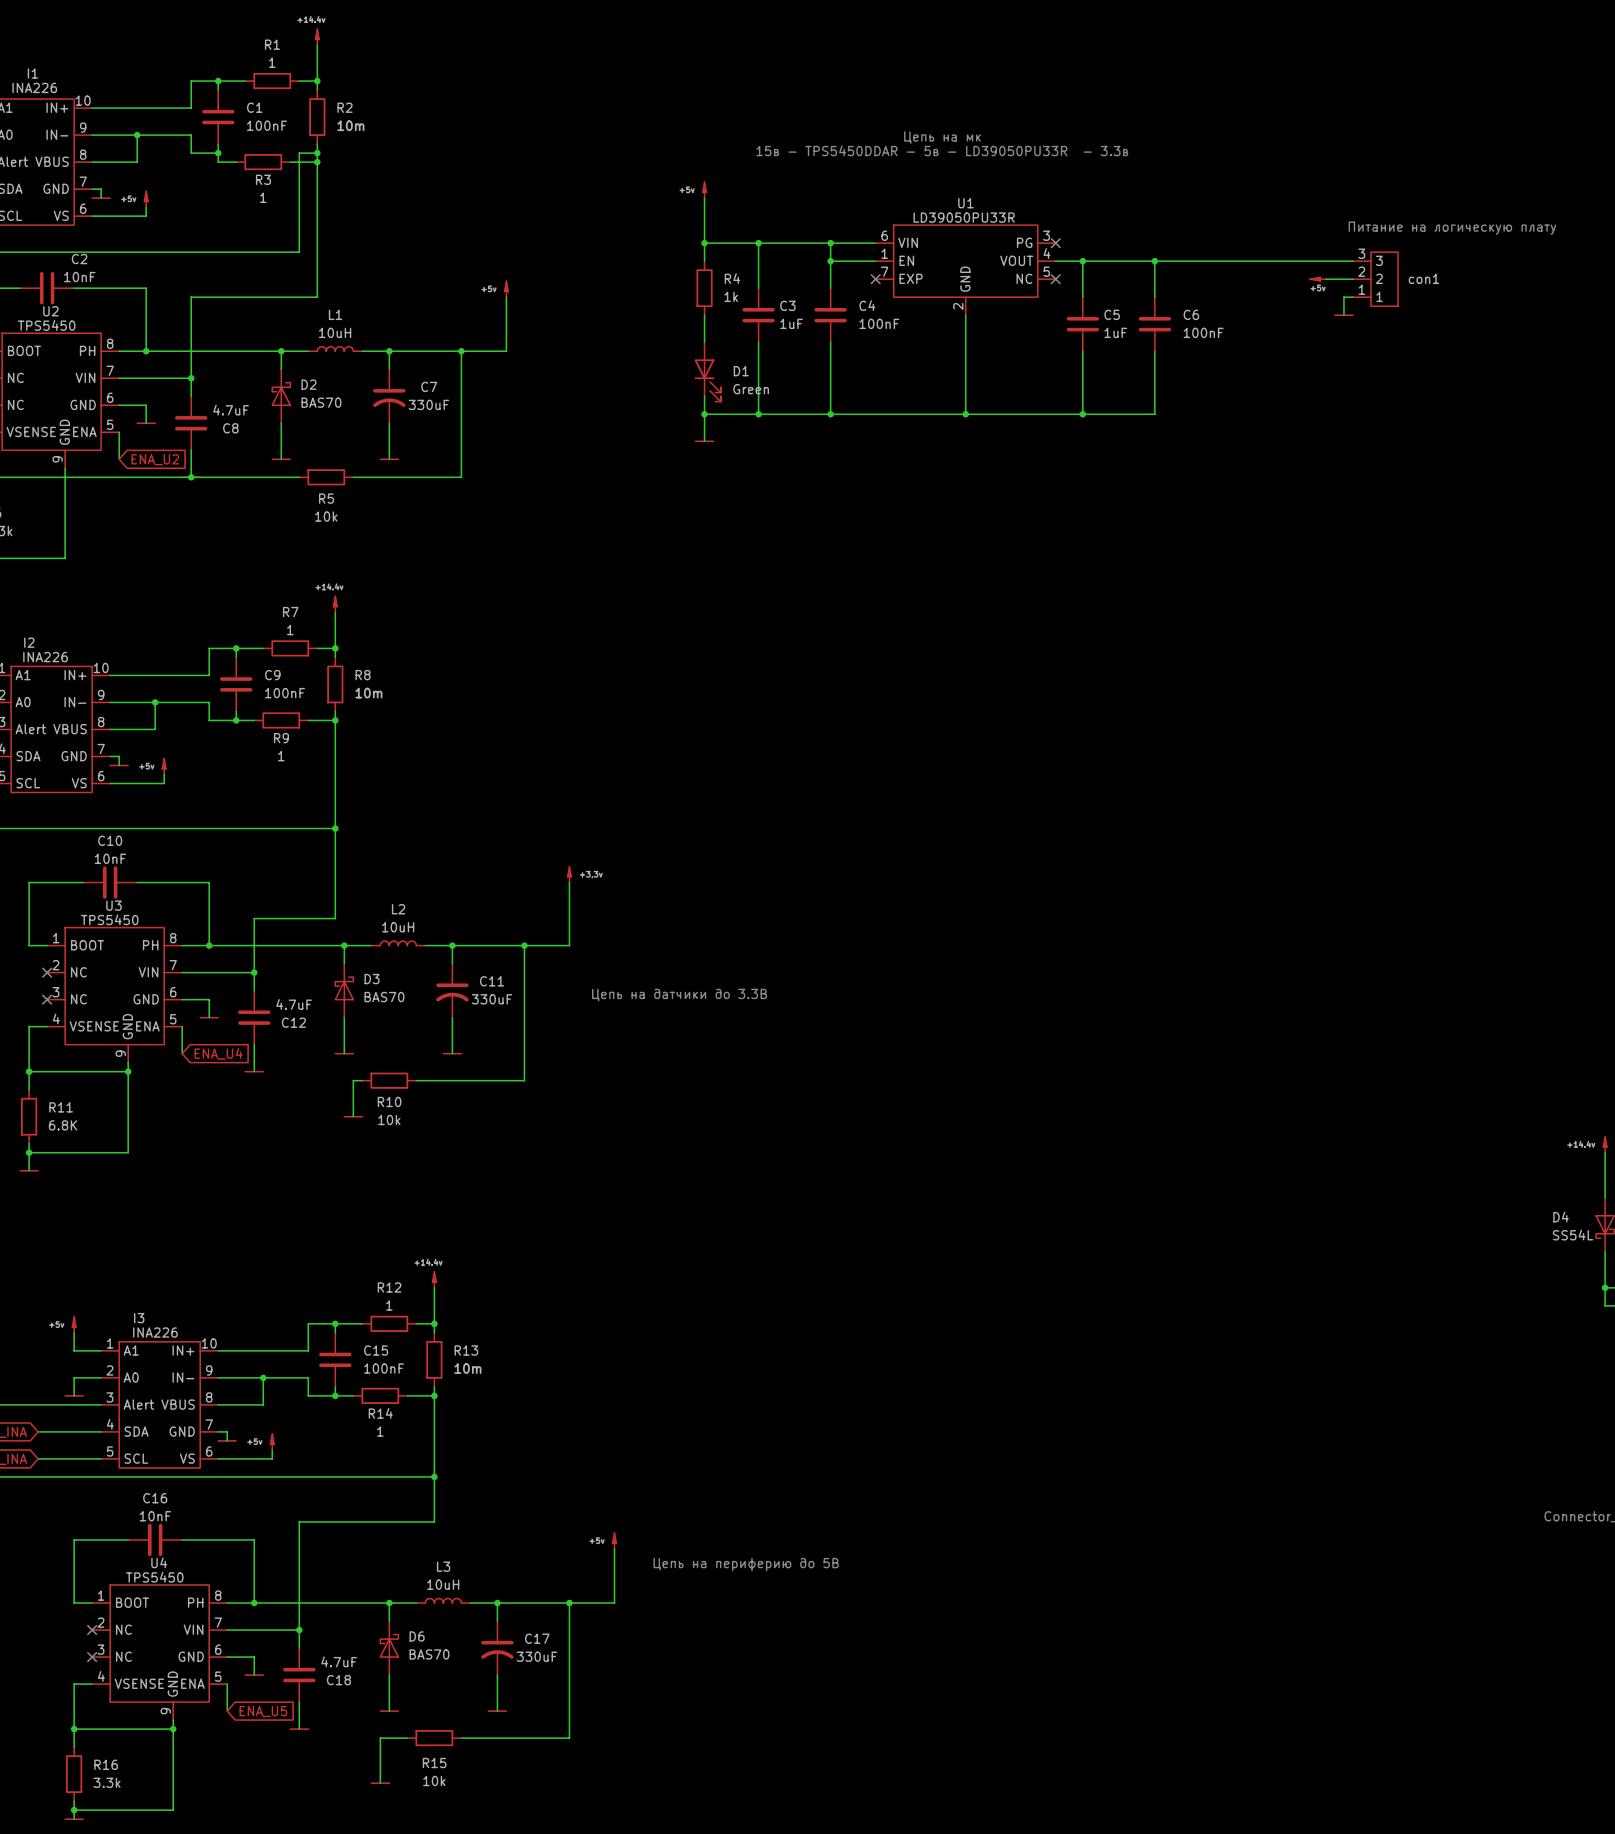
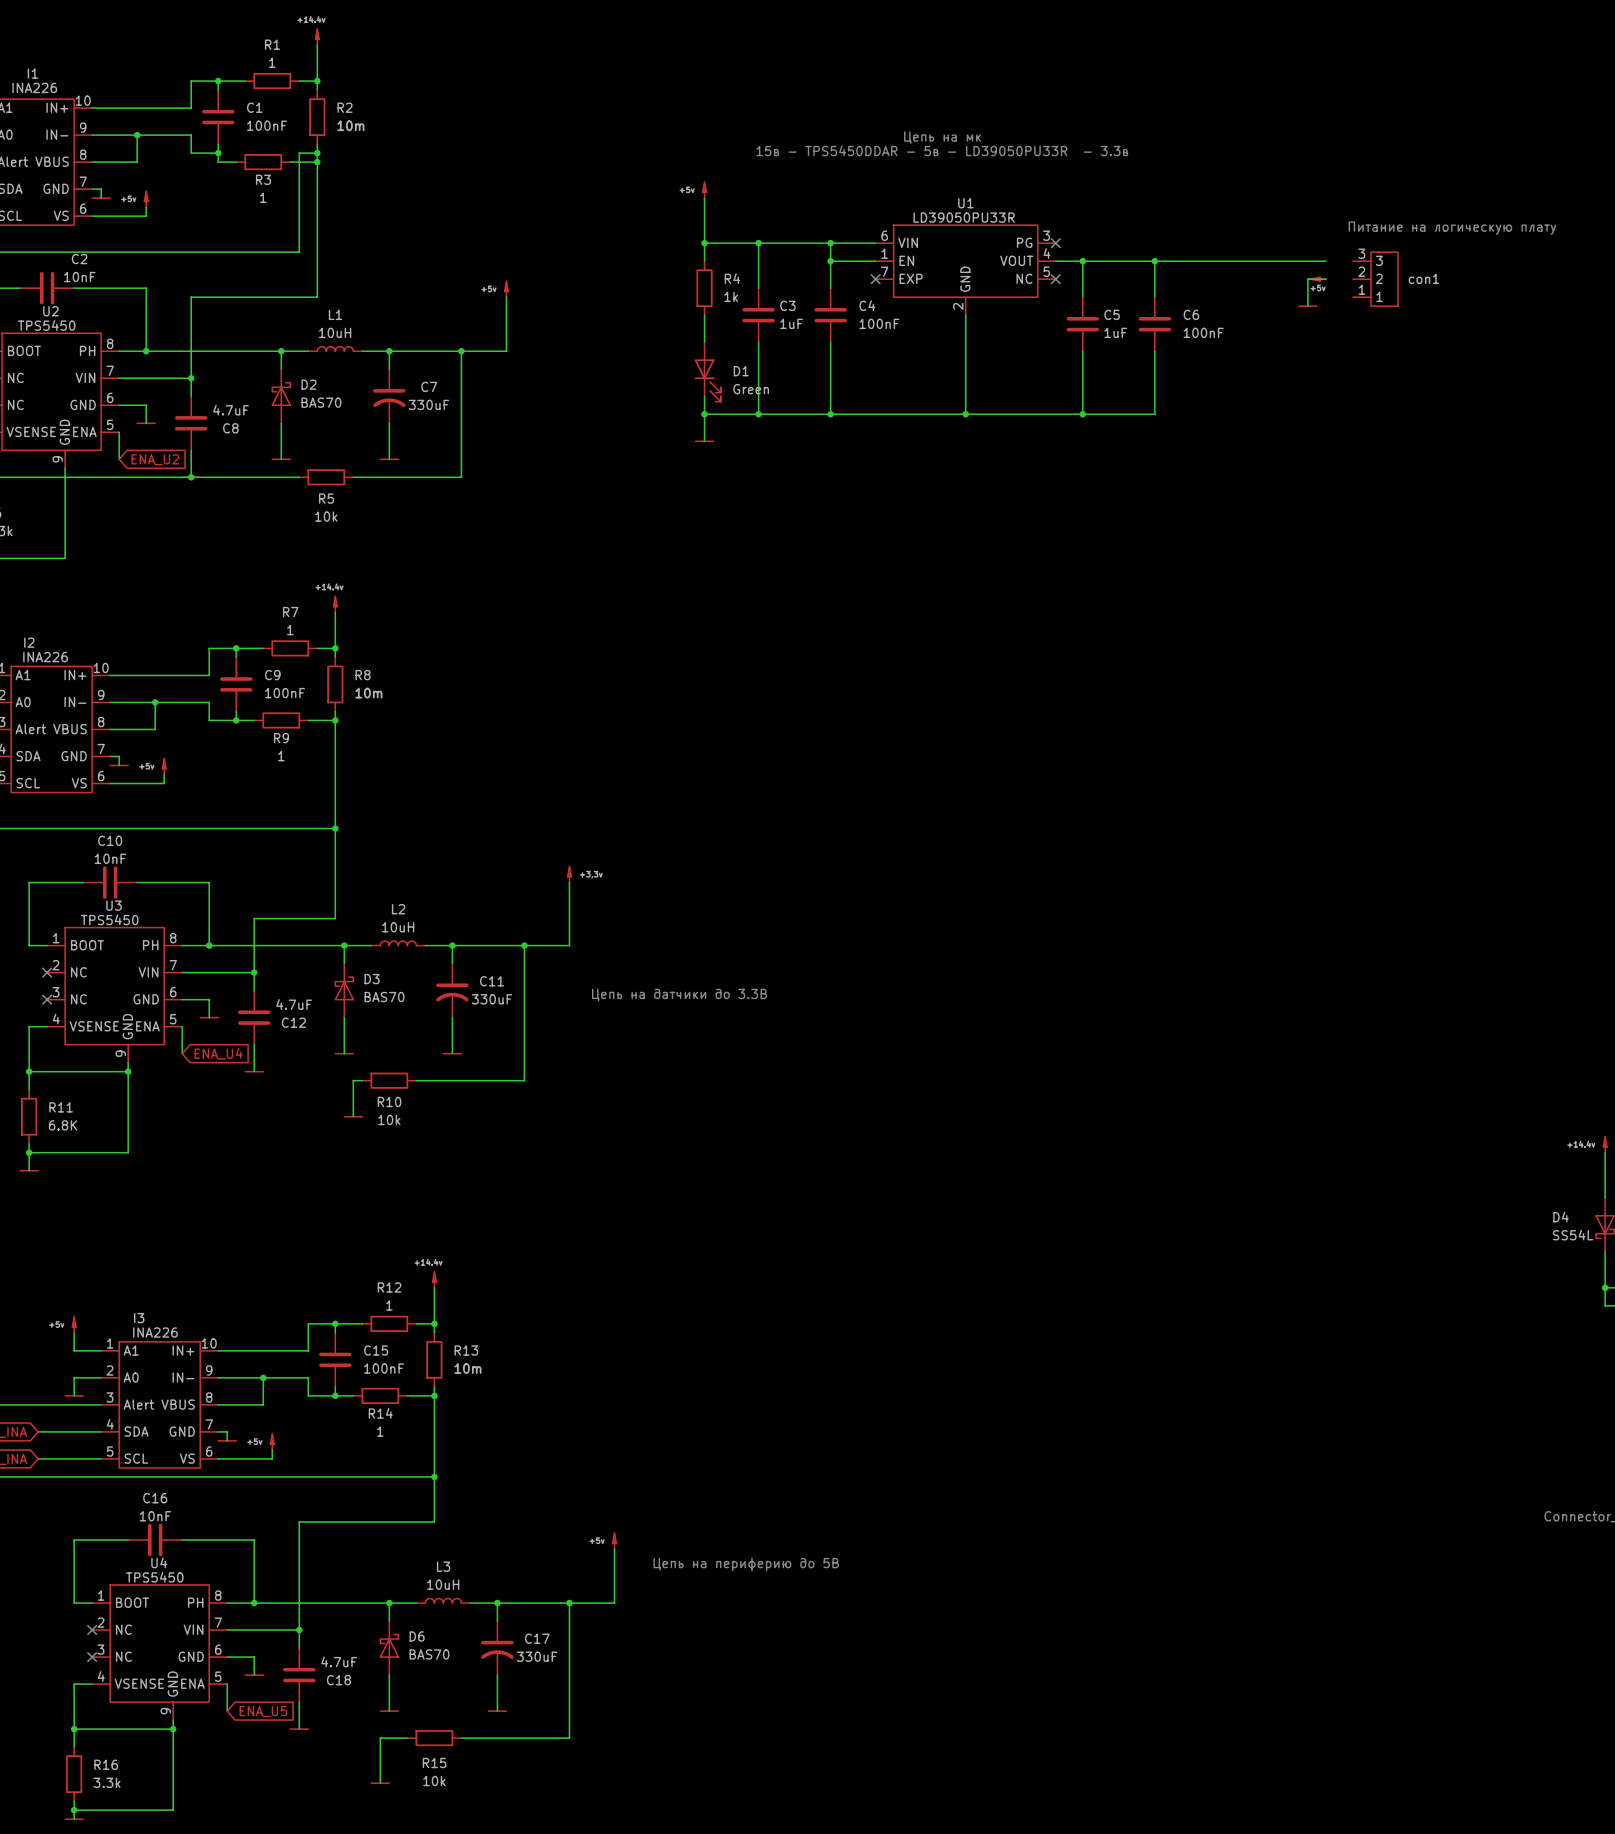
wire: (1325, 261) (1352, 261) -> none
wire: (1325, 279) (1352, 279) -> (1325, 279) (1307, 279) (1307, 306)
wire: (1352, 297) (1343, 297) (1343, 315) -> none
power symbol position: (1343, 315) -> (1307, 306)

